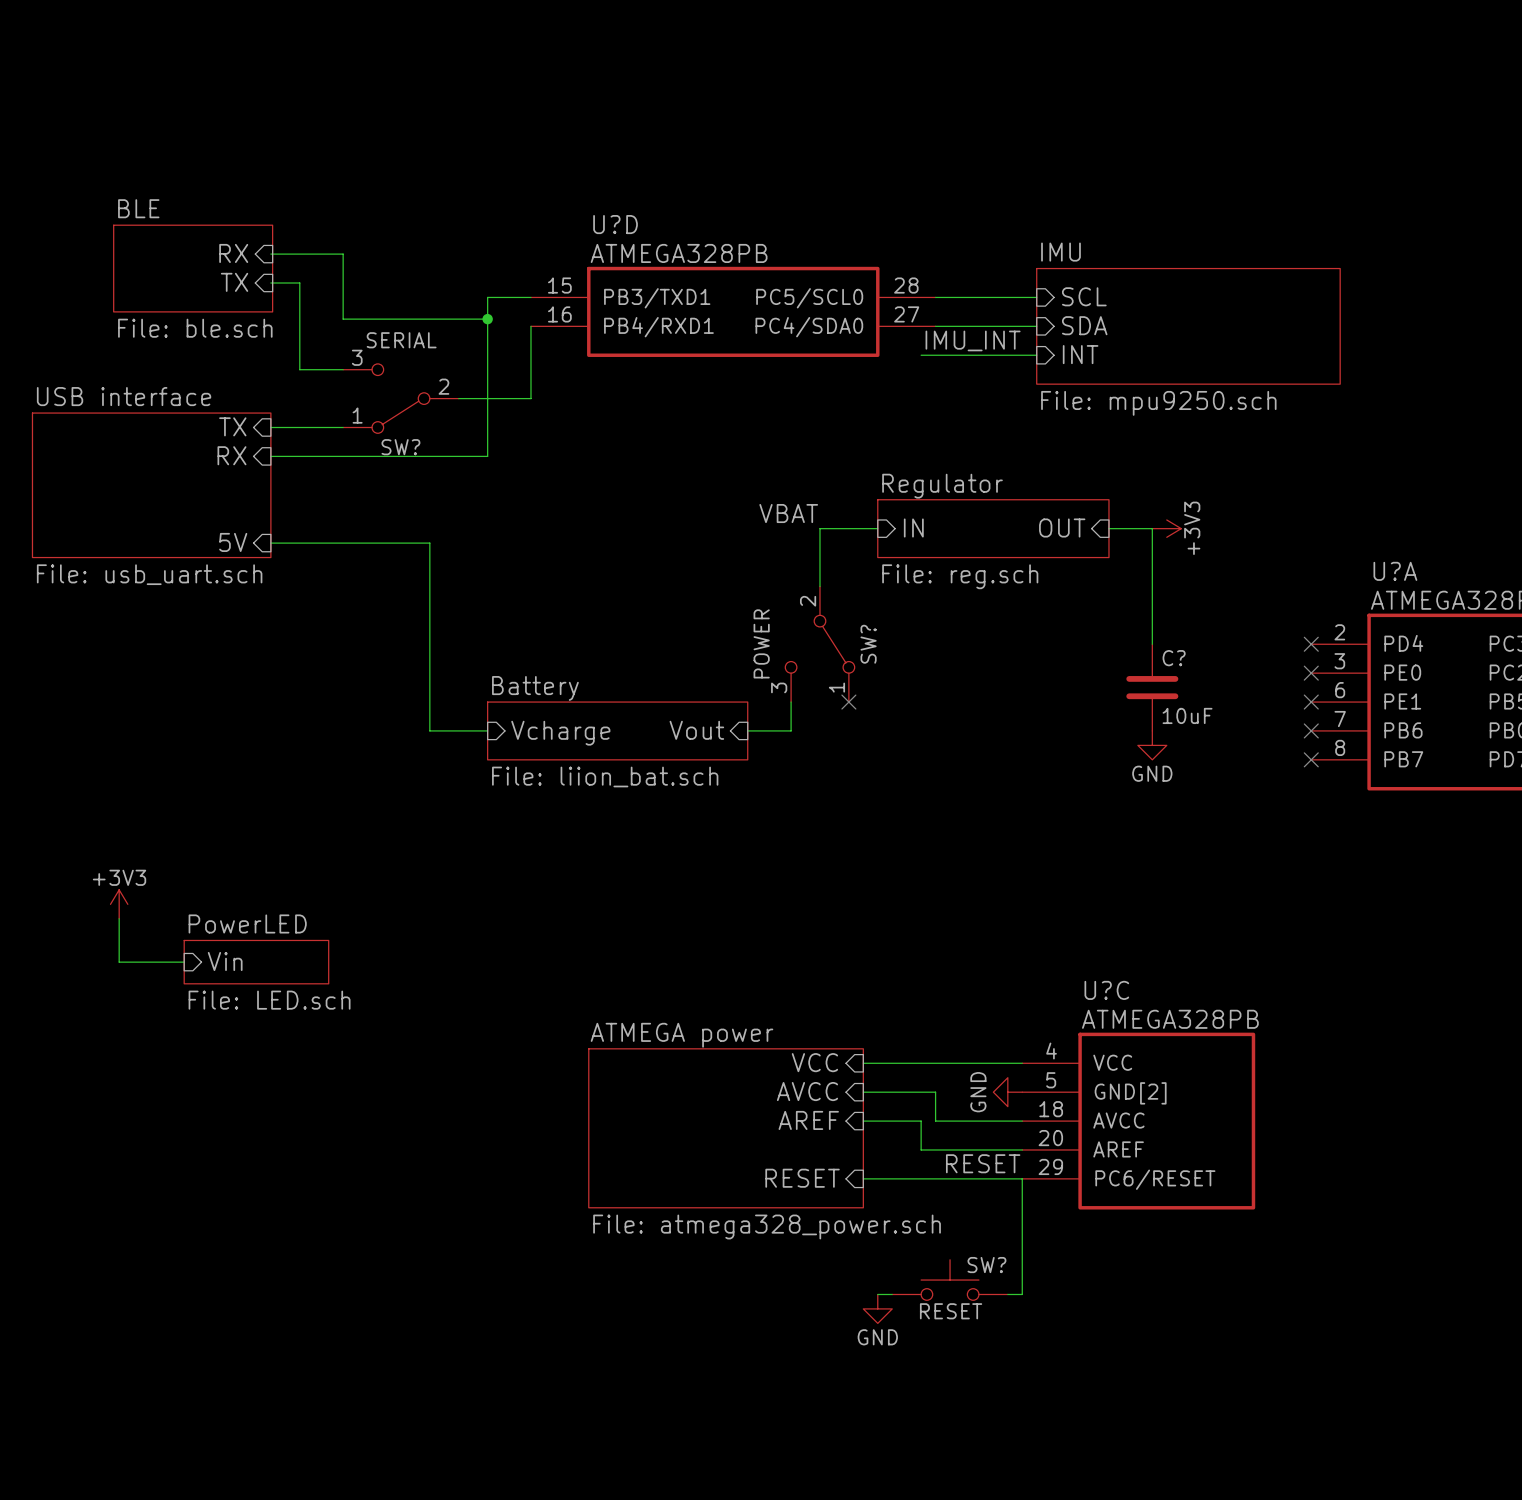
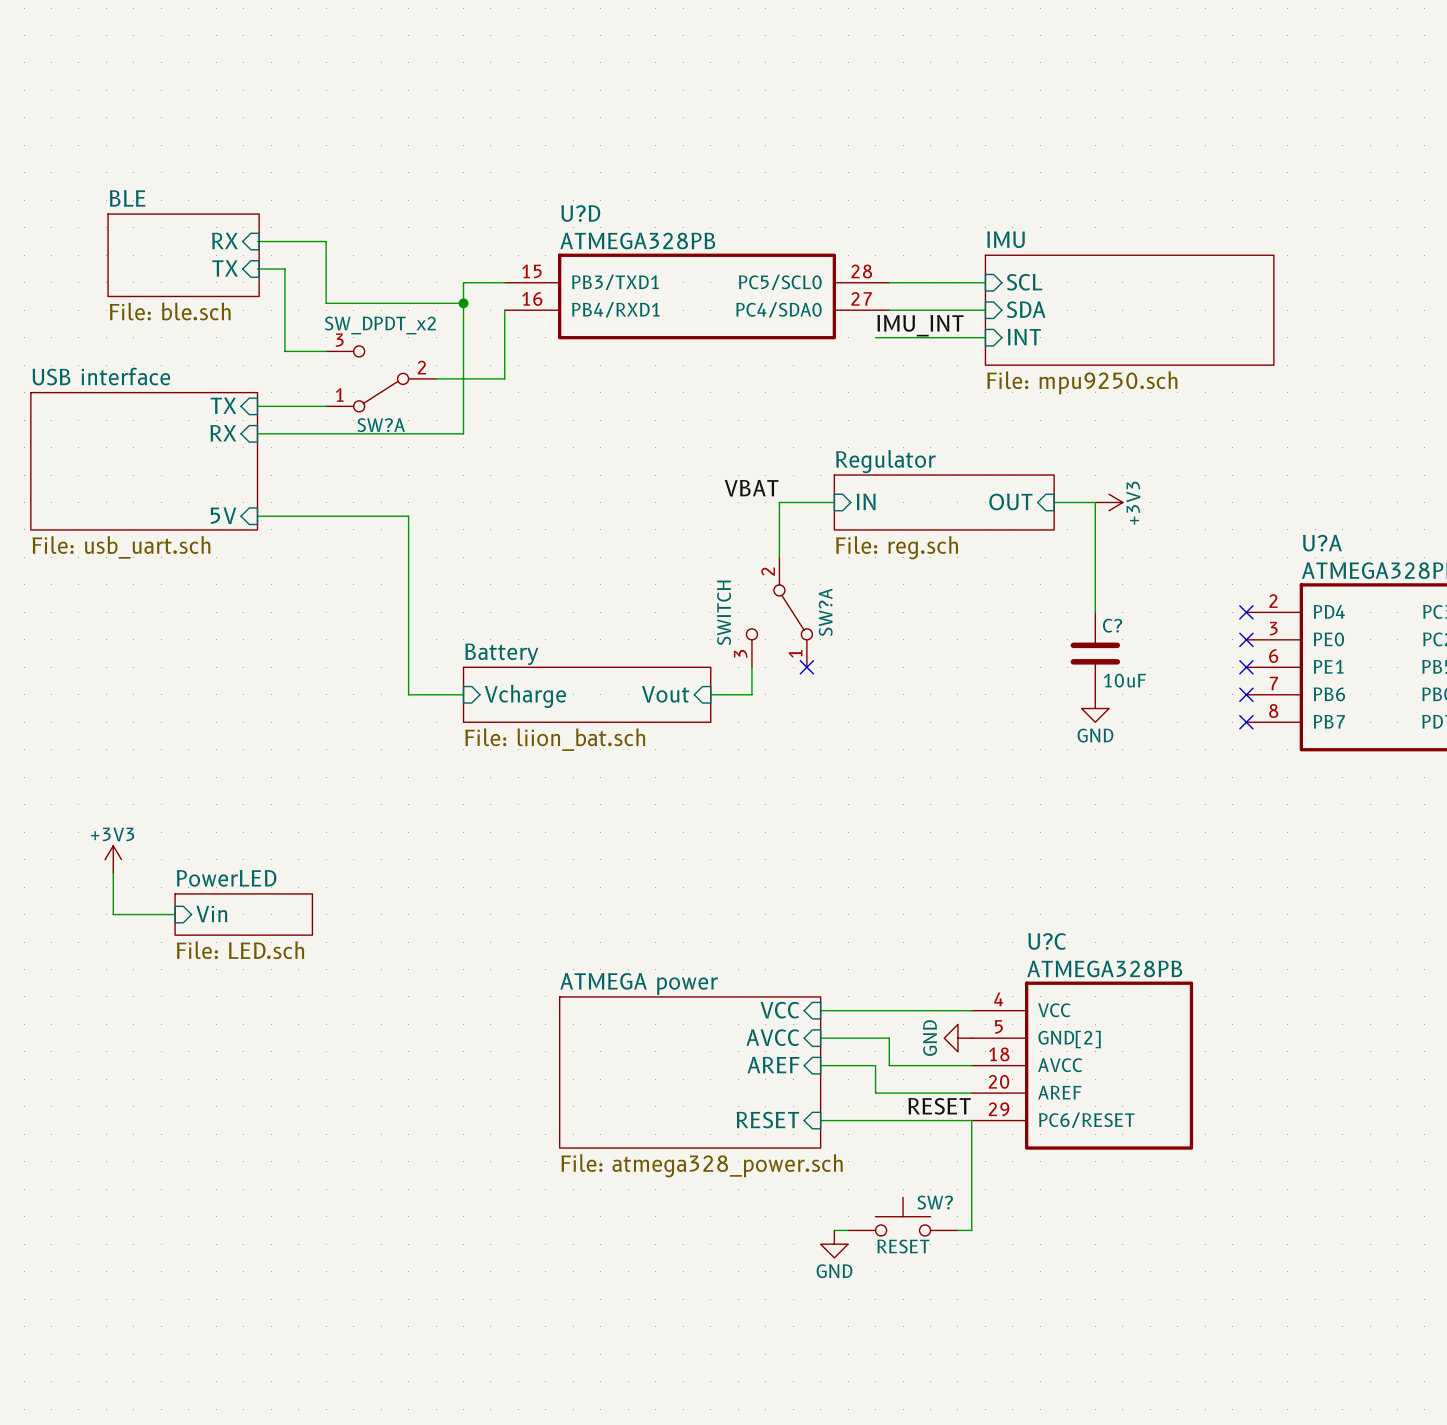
SW? value: SERIAL (401, 340) -> SW_DPDT_x2 (380, 325)
SW? name: SW? (400, 447) -> SW?A (381, 425)
SW? value: POWER (761, 643) -> SWITCH (724, 612)
SW? name: SW? (868, 644) -> SW?A (825, 612)

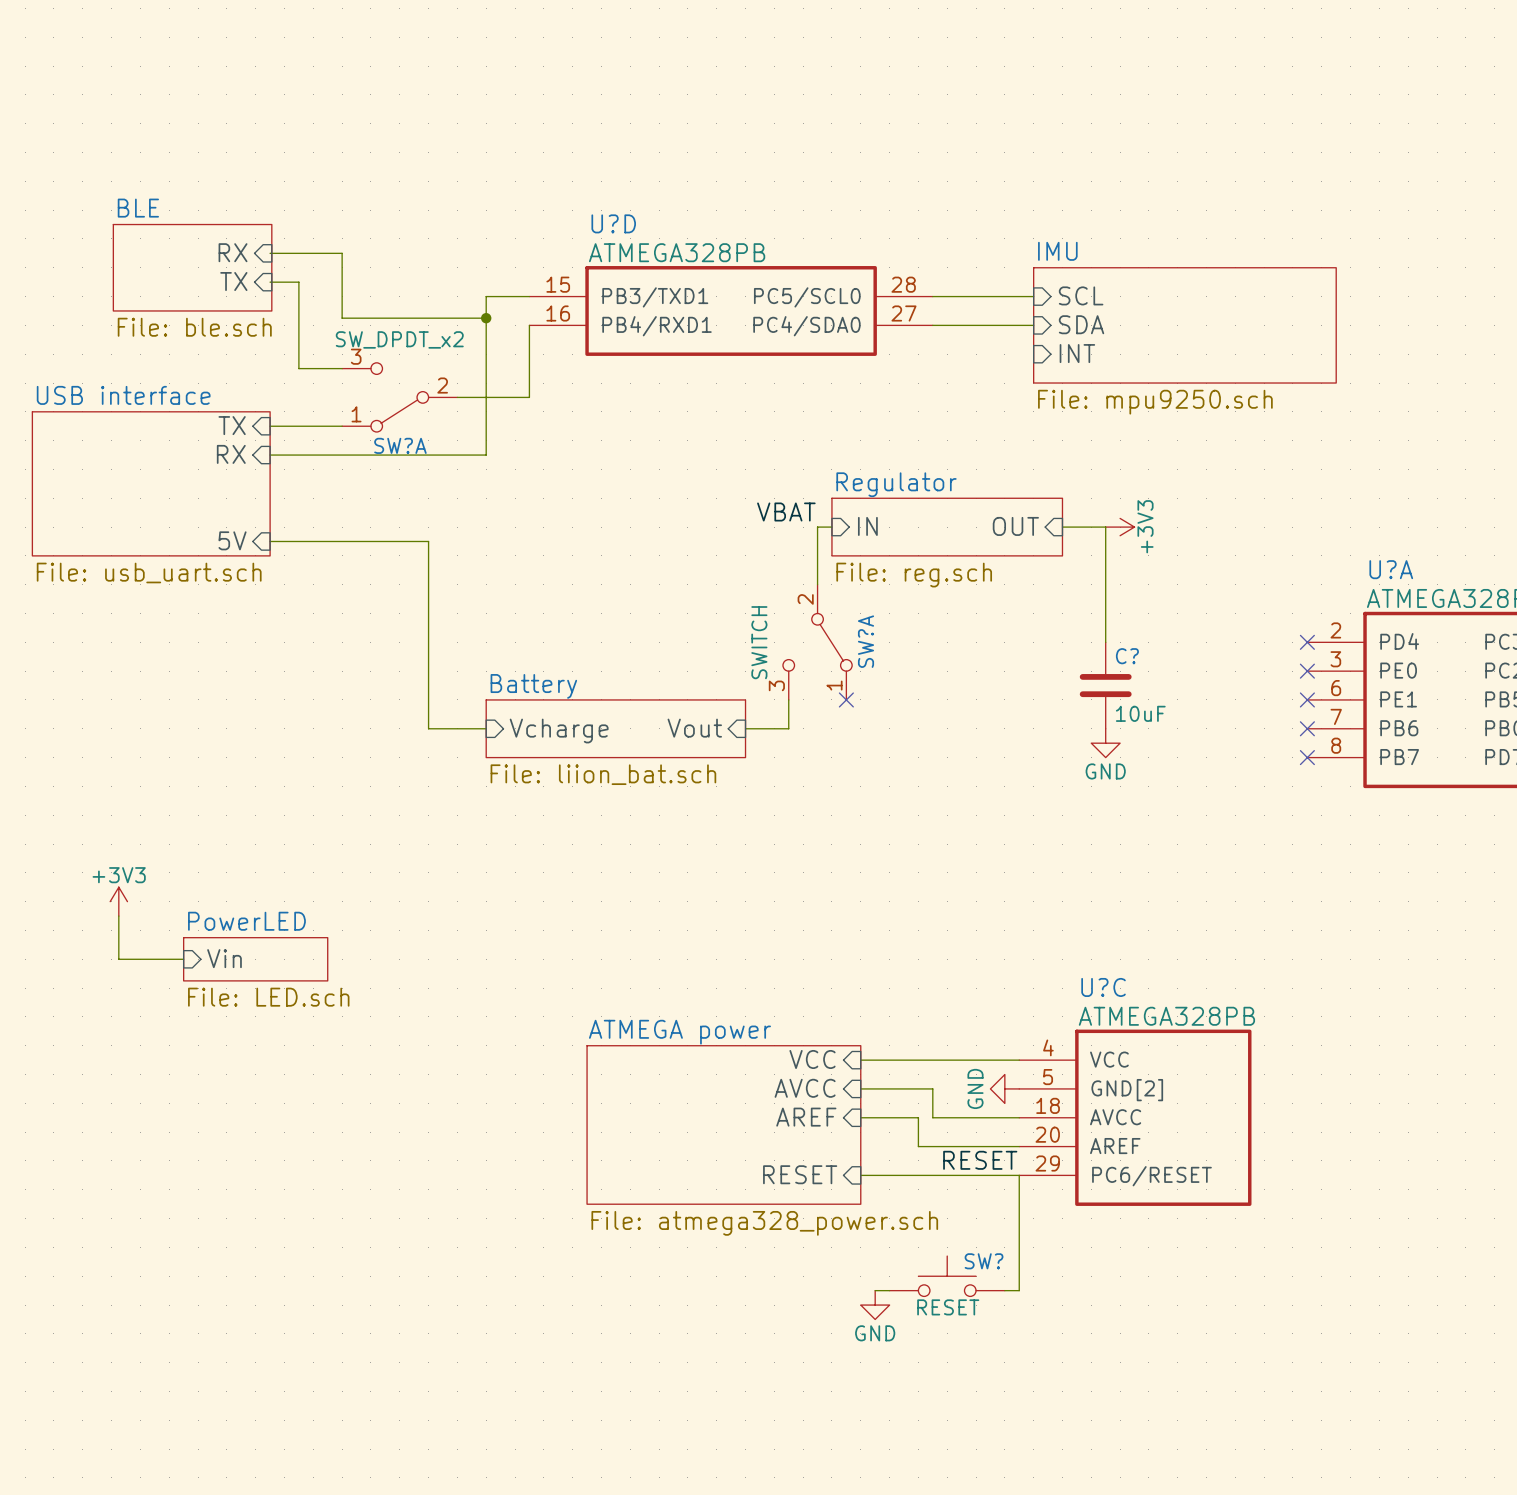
label: IMU_INT (920, 325) -> none
wire: (875, 337) (985, 337) -> none
sheet pin position: IN (866, 501) -> IN (867, 526)
sheet pin position: OUT (1010, 501) -> OUT (1015, 526)
wire: (793, 502) (834, 502) -> none
sheet Regulator position: (944, 502) -> (947, 527)
wire: (1054, 502) (1095, 502) (1095, 612) -> (1062, 527) (1105, 527) (1105, 642)
power symbol position: +3V3 (1109, 502) -> +3V3 (1120, 527)
C? position: (1095, 653) -> (1105, 685)
power symbol position: GND (1095, 708) -> GND (1105, 743)

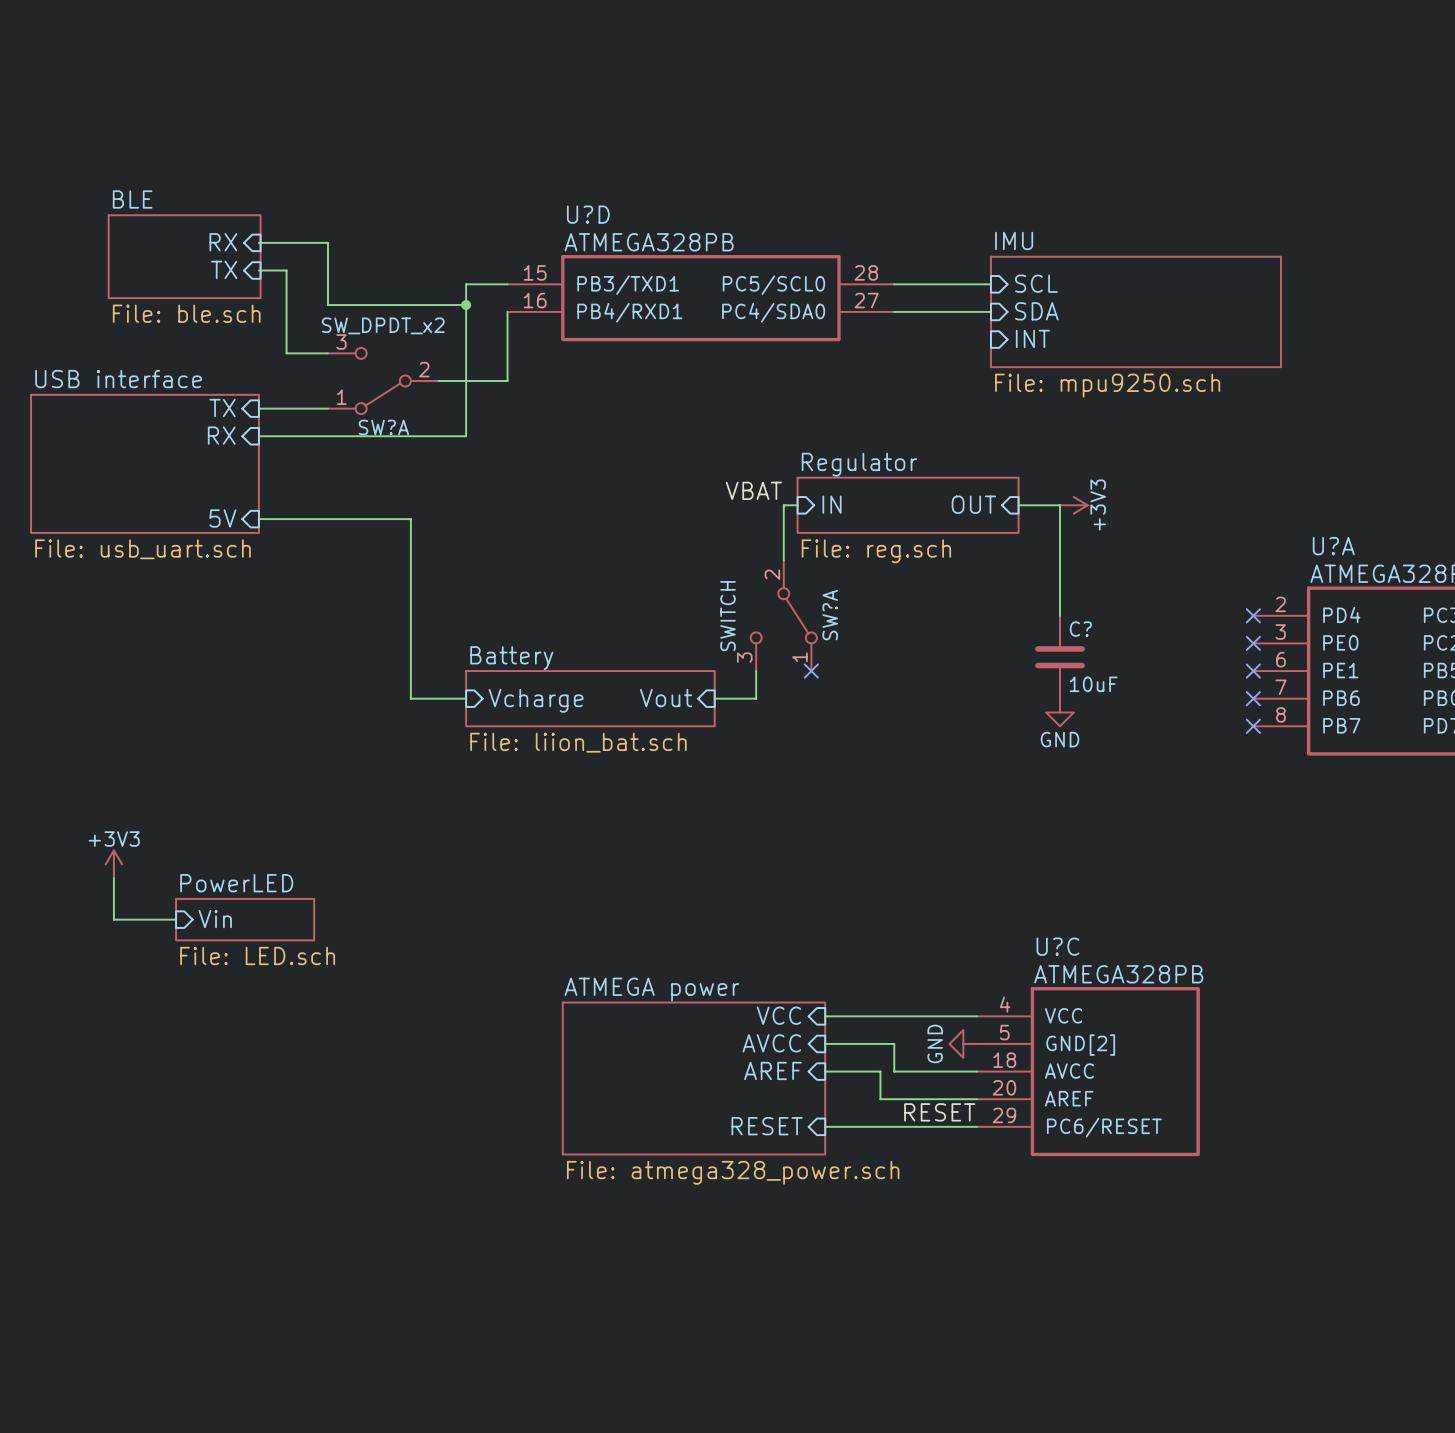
wire: (1019, 1175) (1019, 1290) (1004, 1290) -> none
SW?: RESET (947, 1276) -> none
wire: (875, 1290) (889, 1290) -> none
power symbol: GND (875, 1305) -> none

